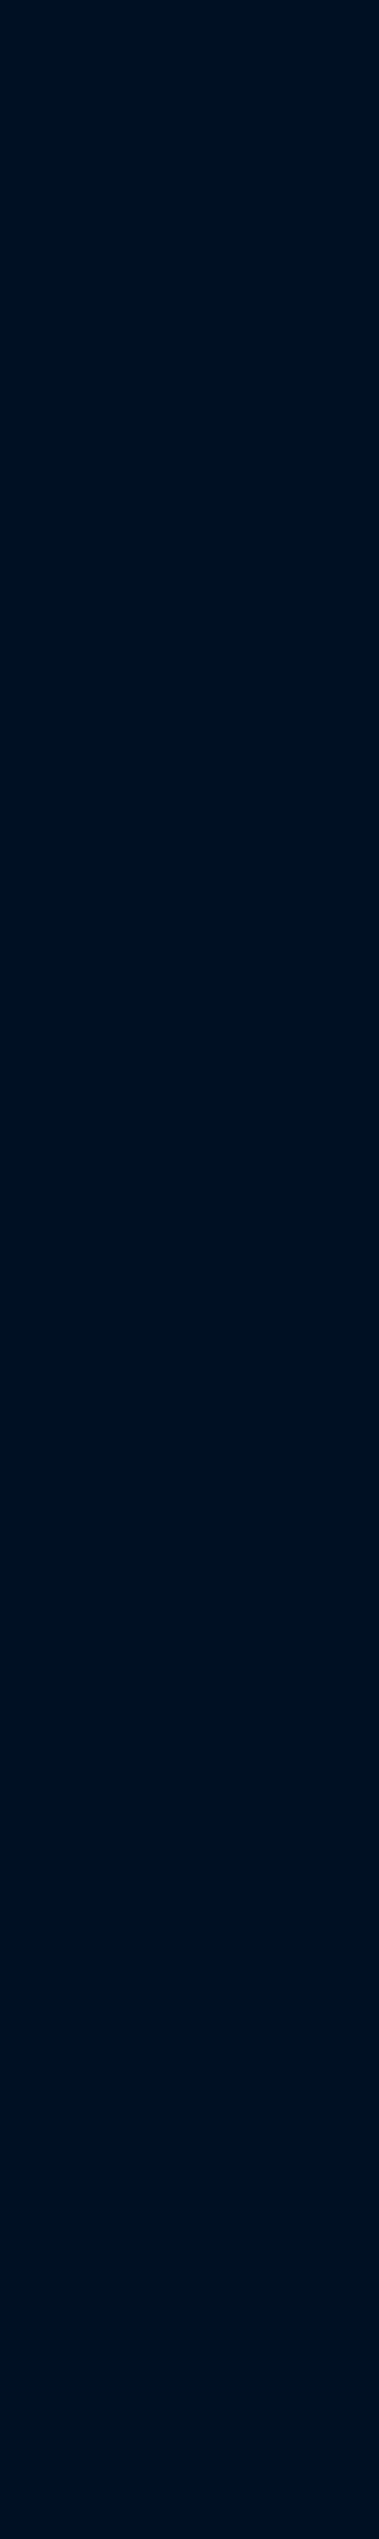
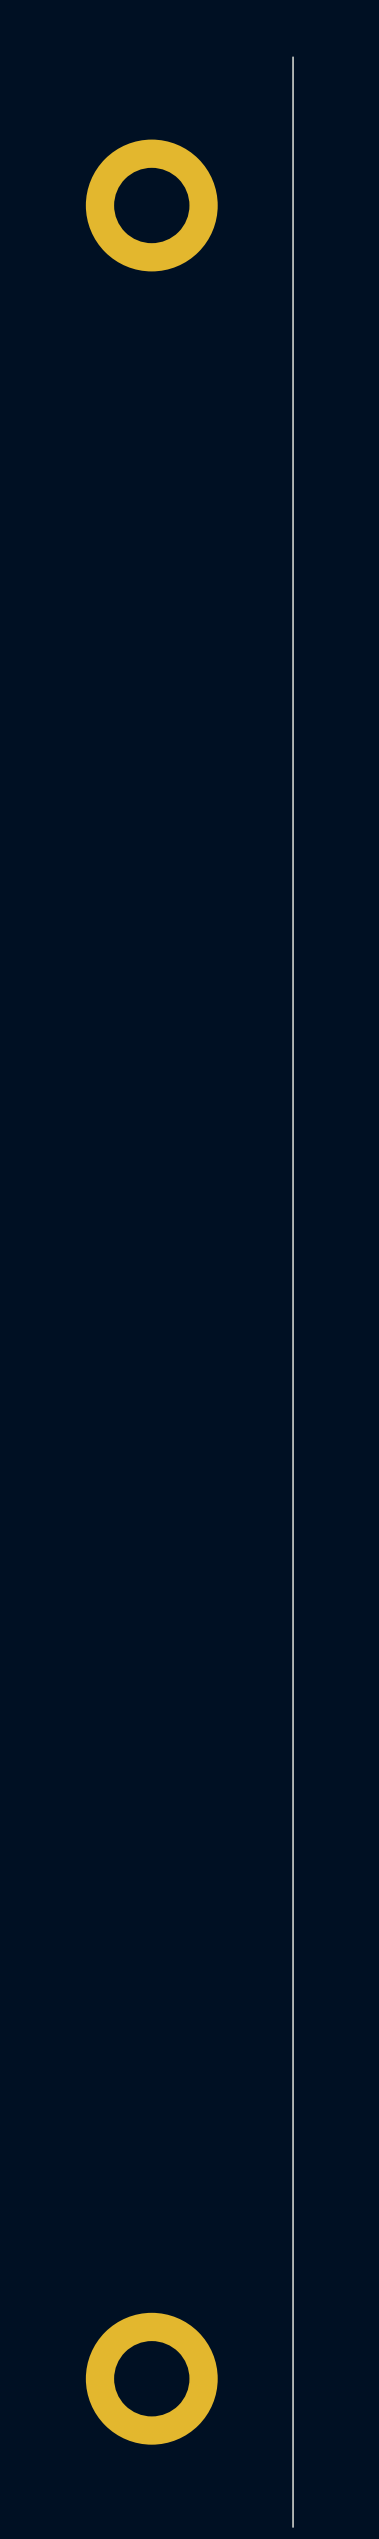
board edge: none -> (293, 57) (293, 2527)
part: none -> (151, 205)
part: none -> (151, 2378)

